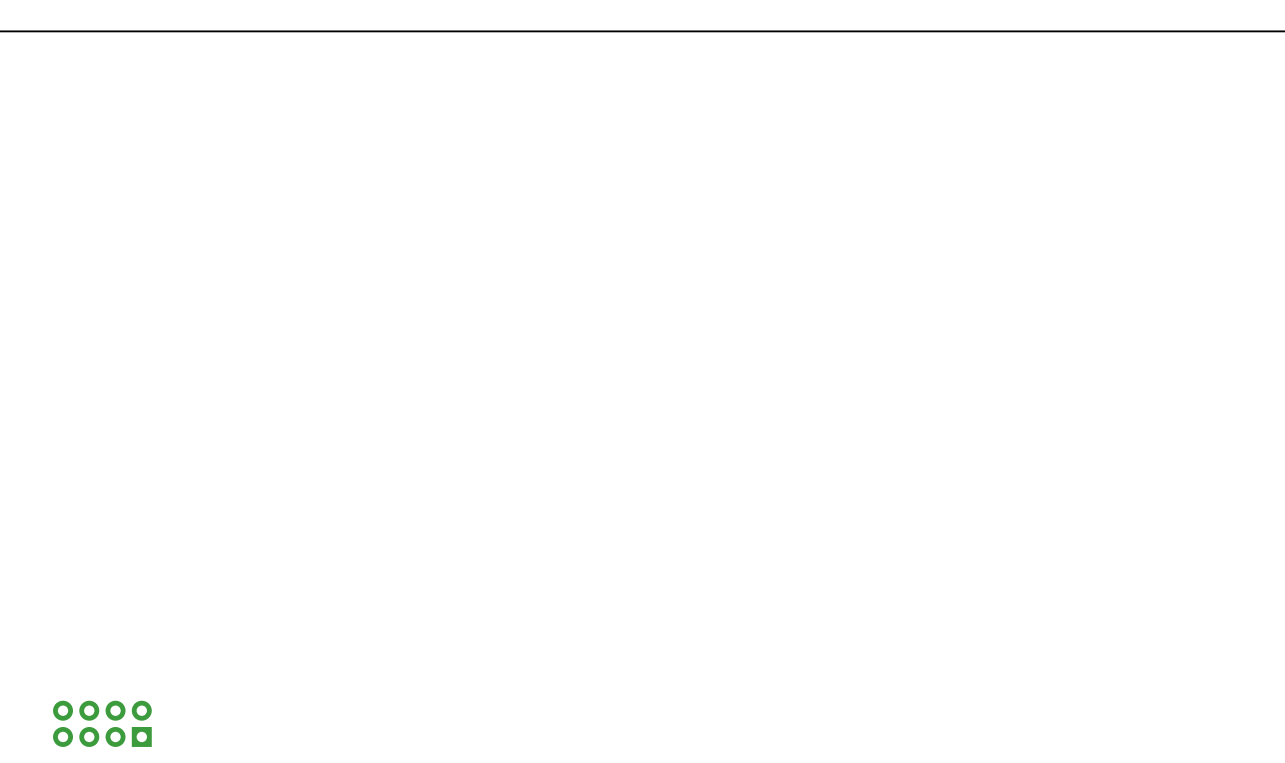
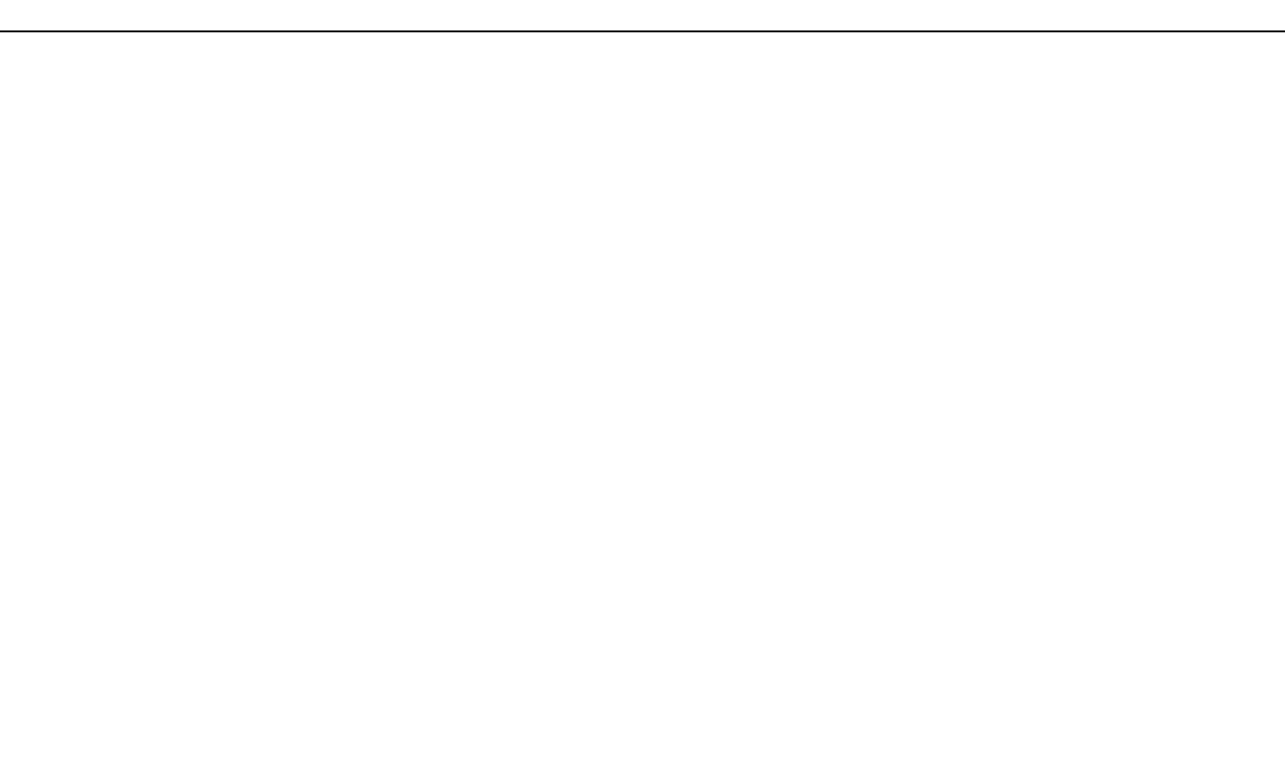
part: (102, 723) -> none

